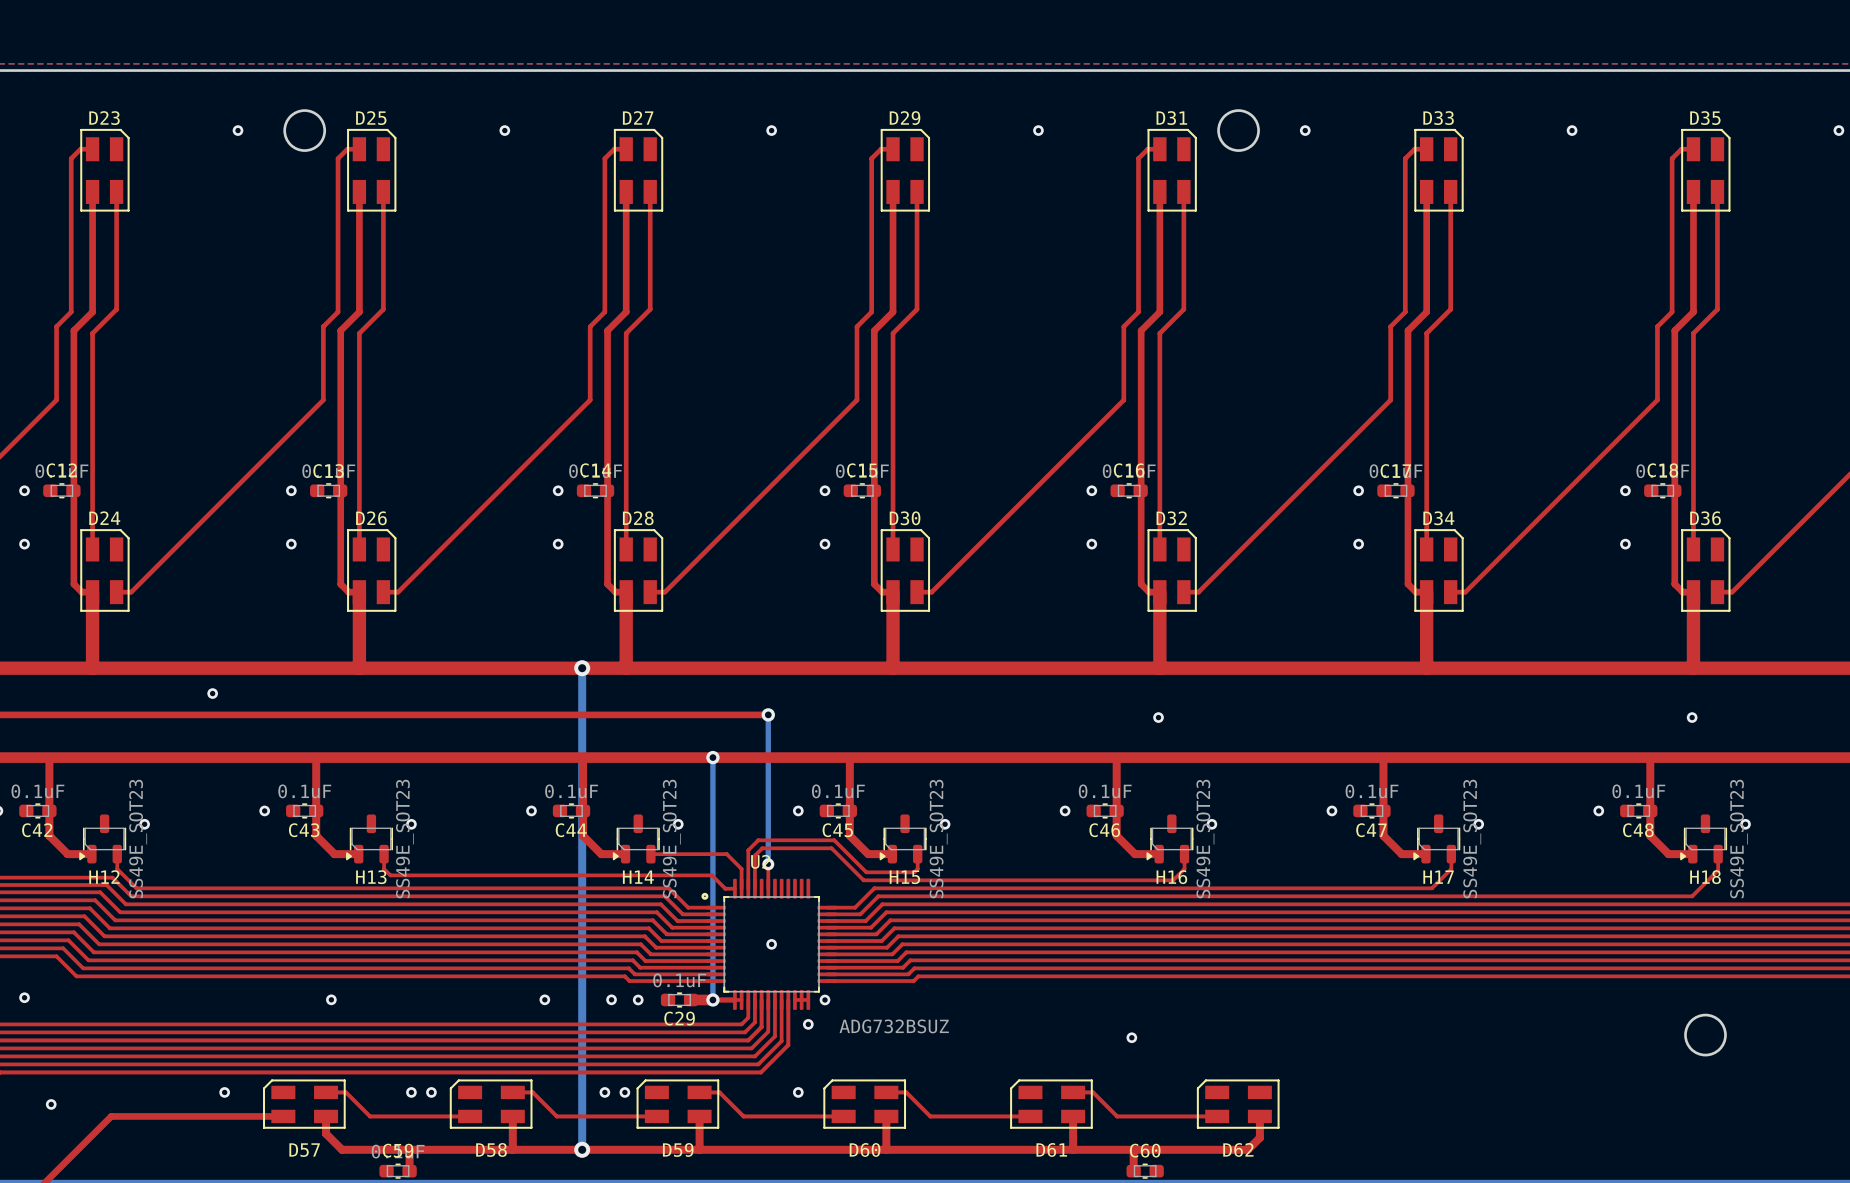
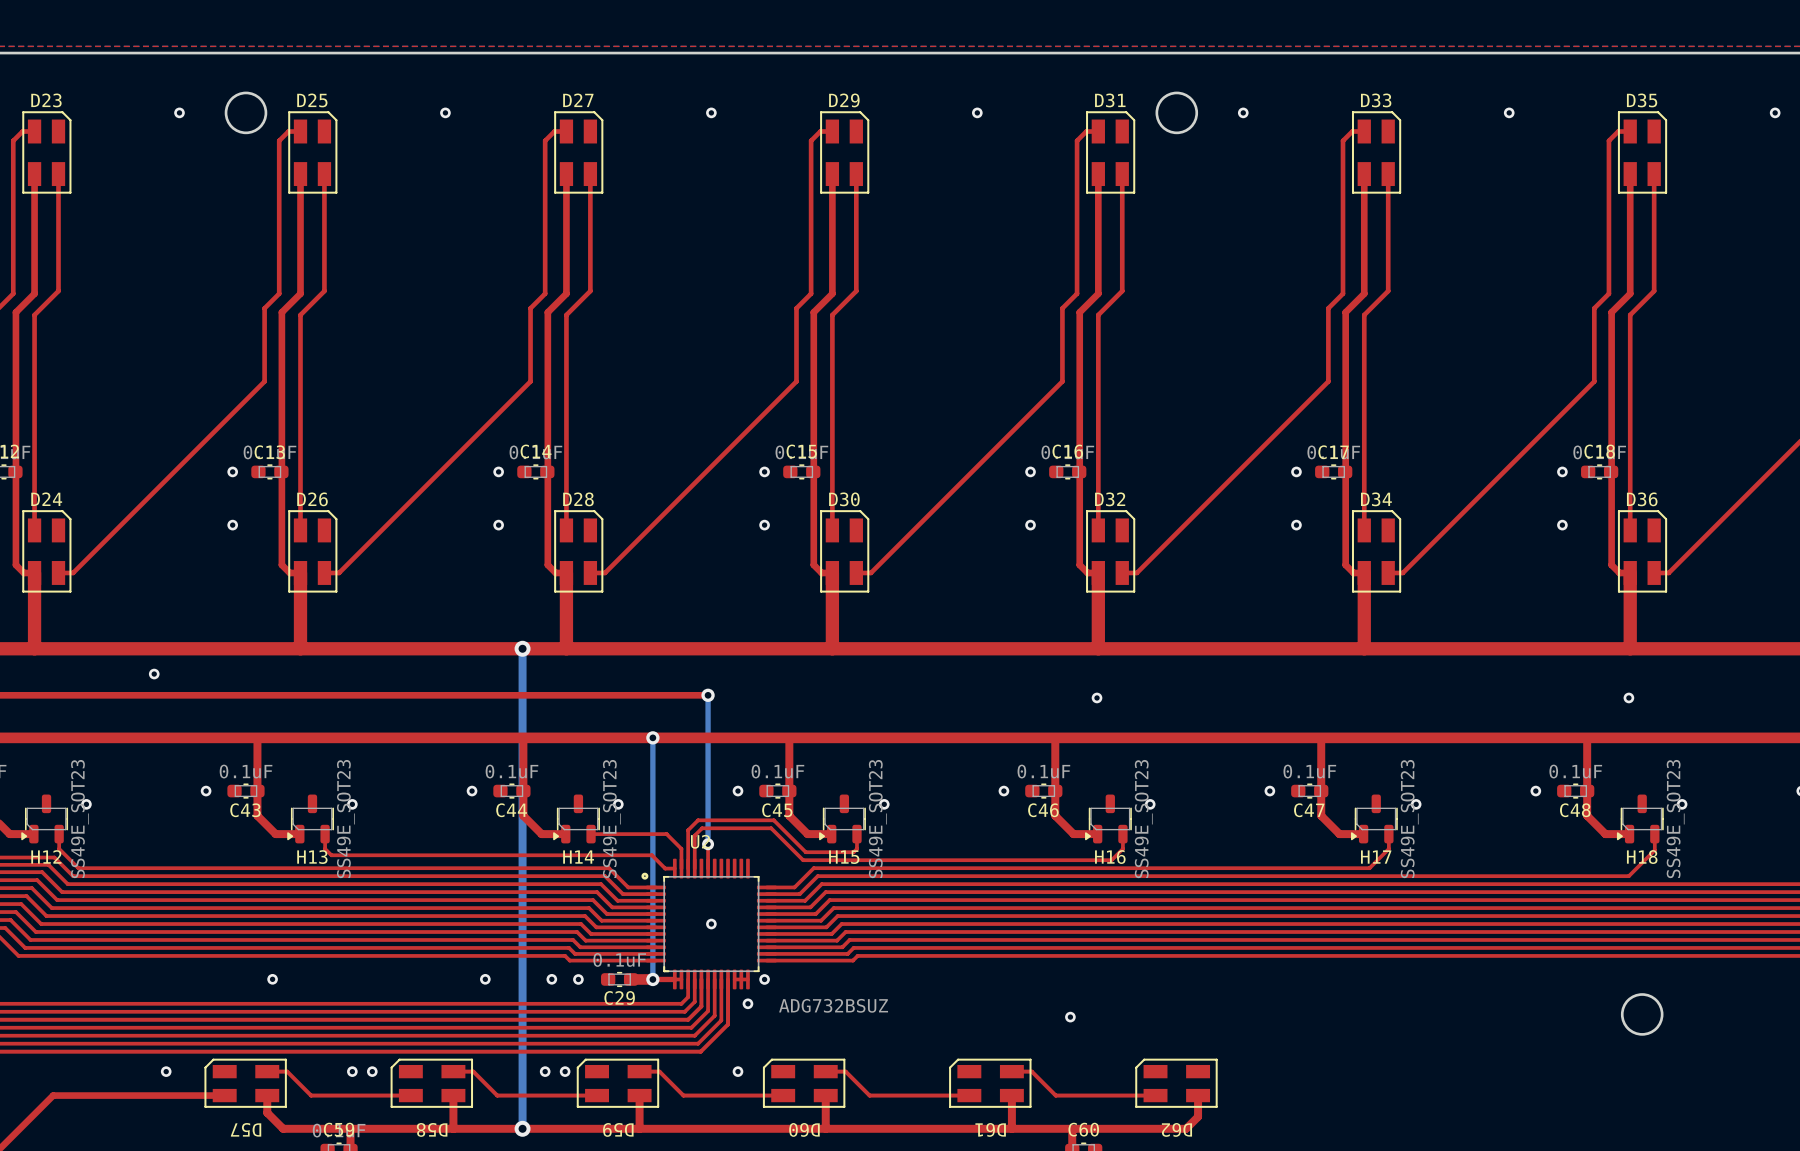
D58 name rotation: 0° (491, 1149) -> 180° (432, 1129)
D59 name rotation: 0° (678, 1149) -> 180° (618, 1129)
D60 name rotation: 0° (865, 1149) -> 180° (804, 1129)
D61 name rotation: 0° (1051, 1149) -> 180° (990, 1129)
D62 name rotation: 0° (1238, 1149) -> 180° (1176, 1129)
D57 name rotation: 0° (304, 1150) -> 180° (246, 1129)

